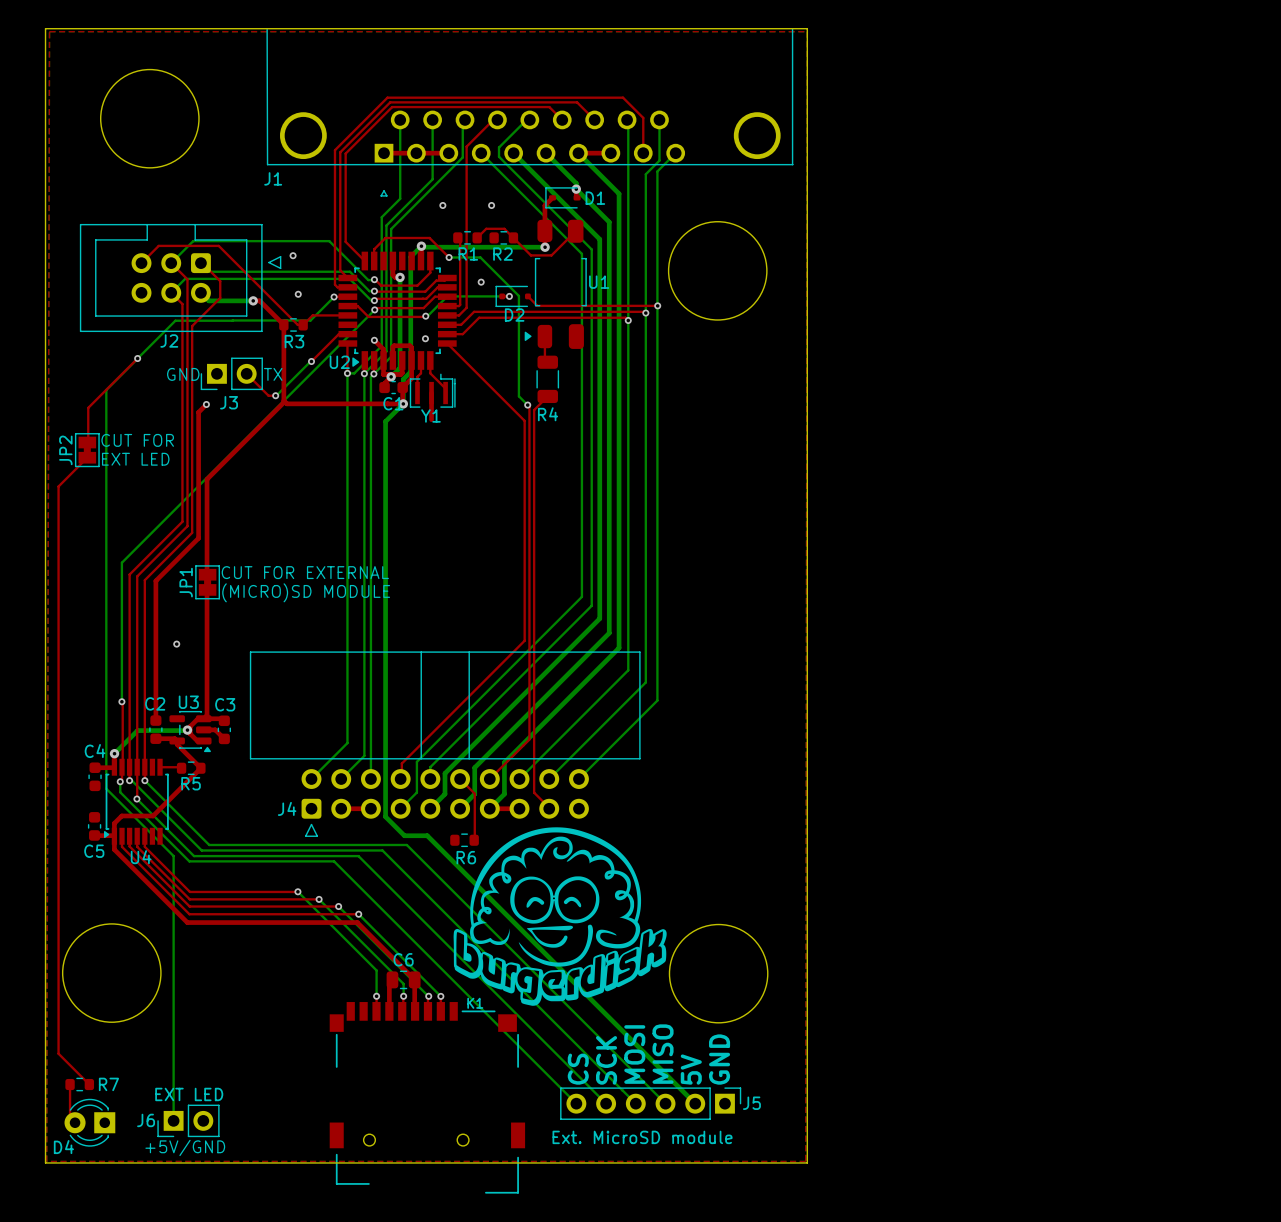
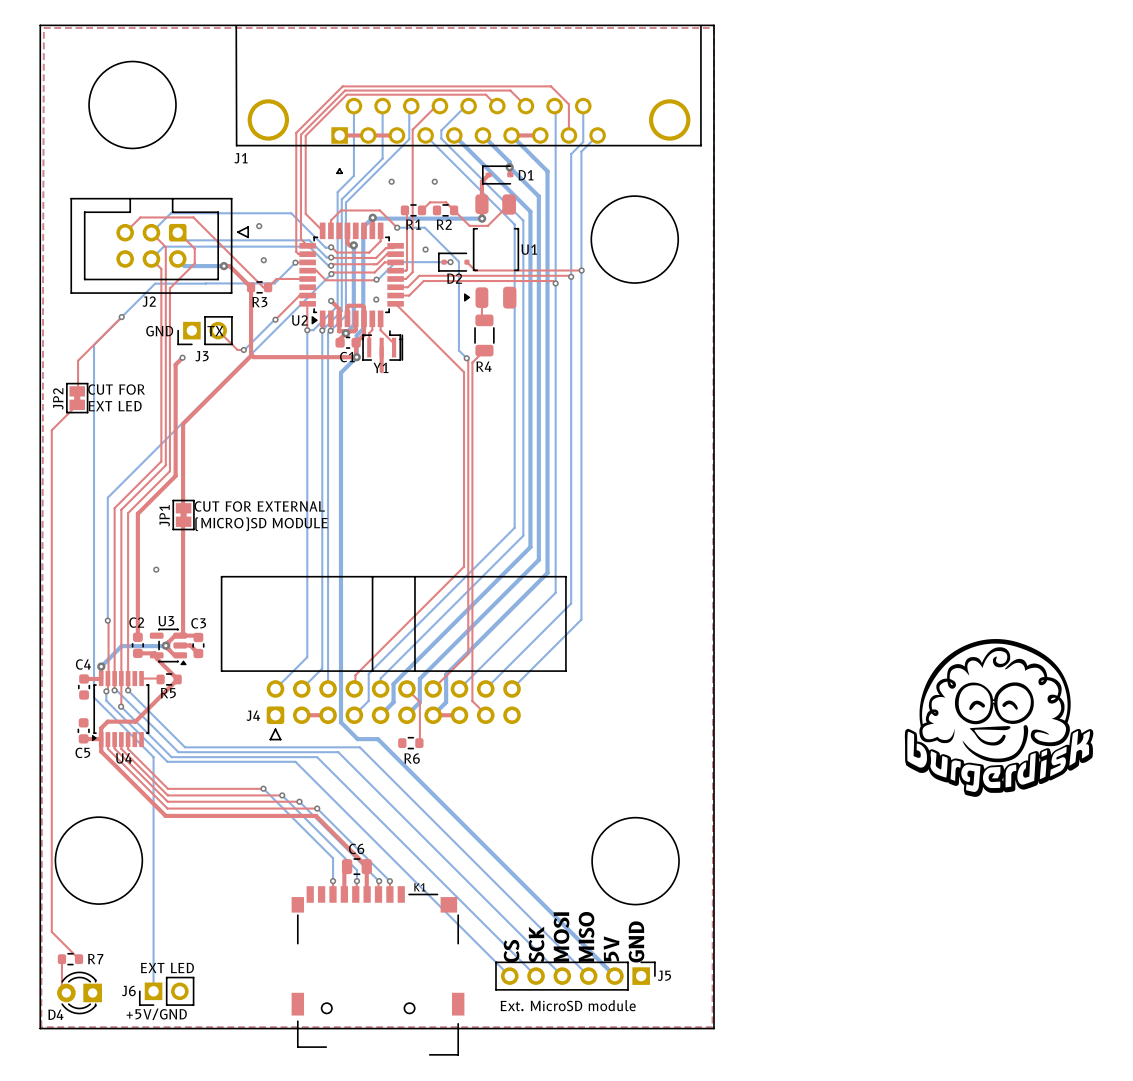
drawing: none -> [904, 639, 1094, 797]
drawing: [453, 827, 667, 1006] -> none

